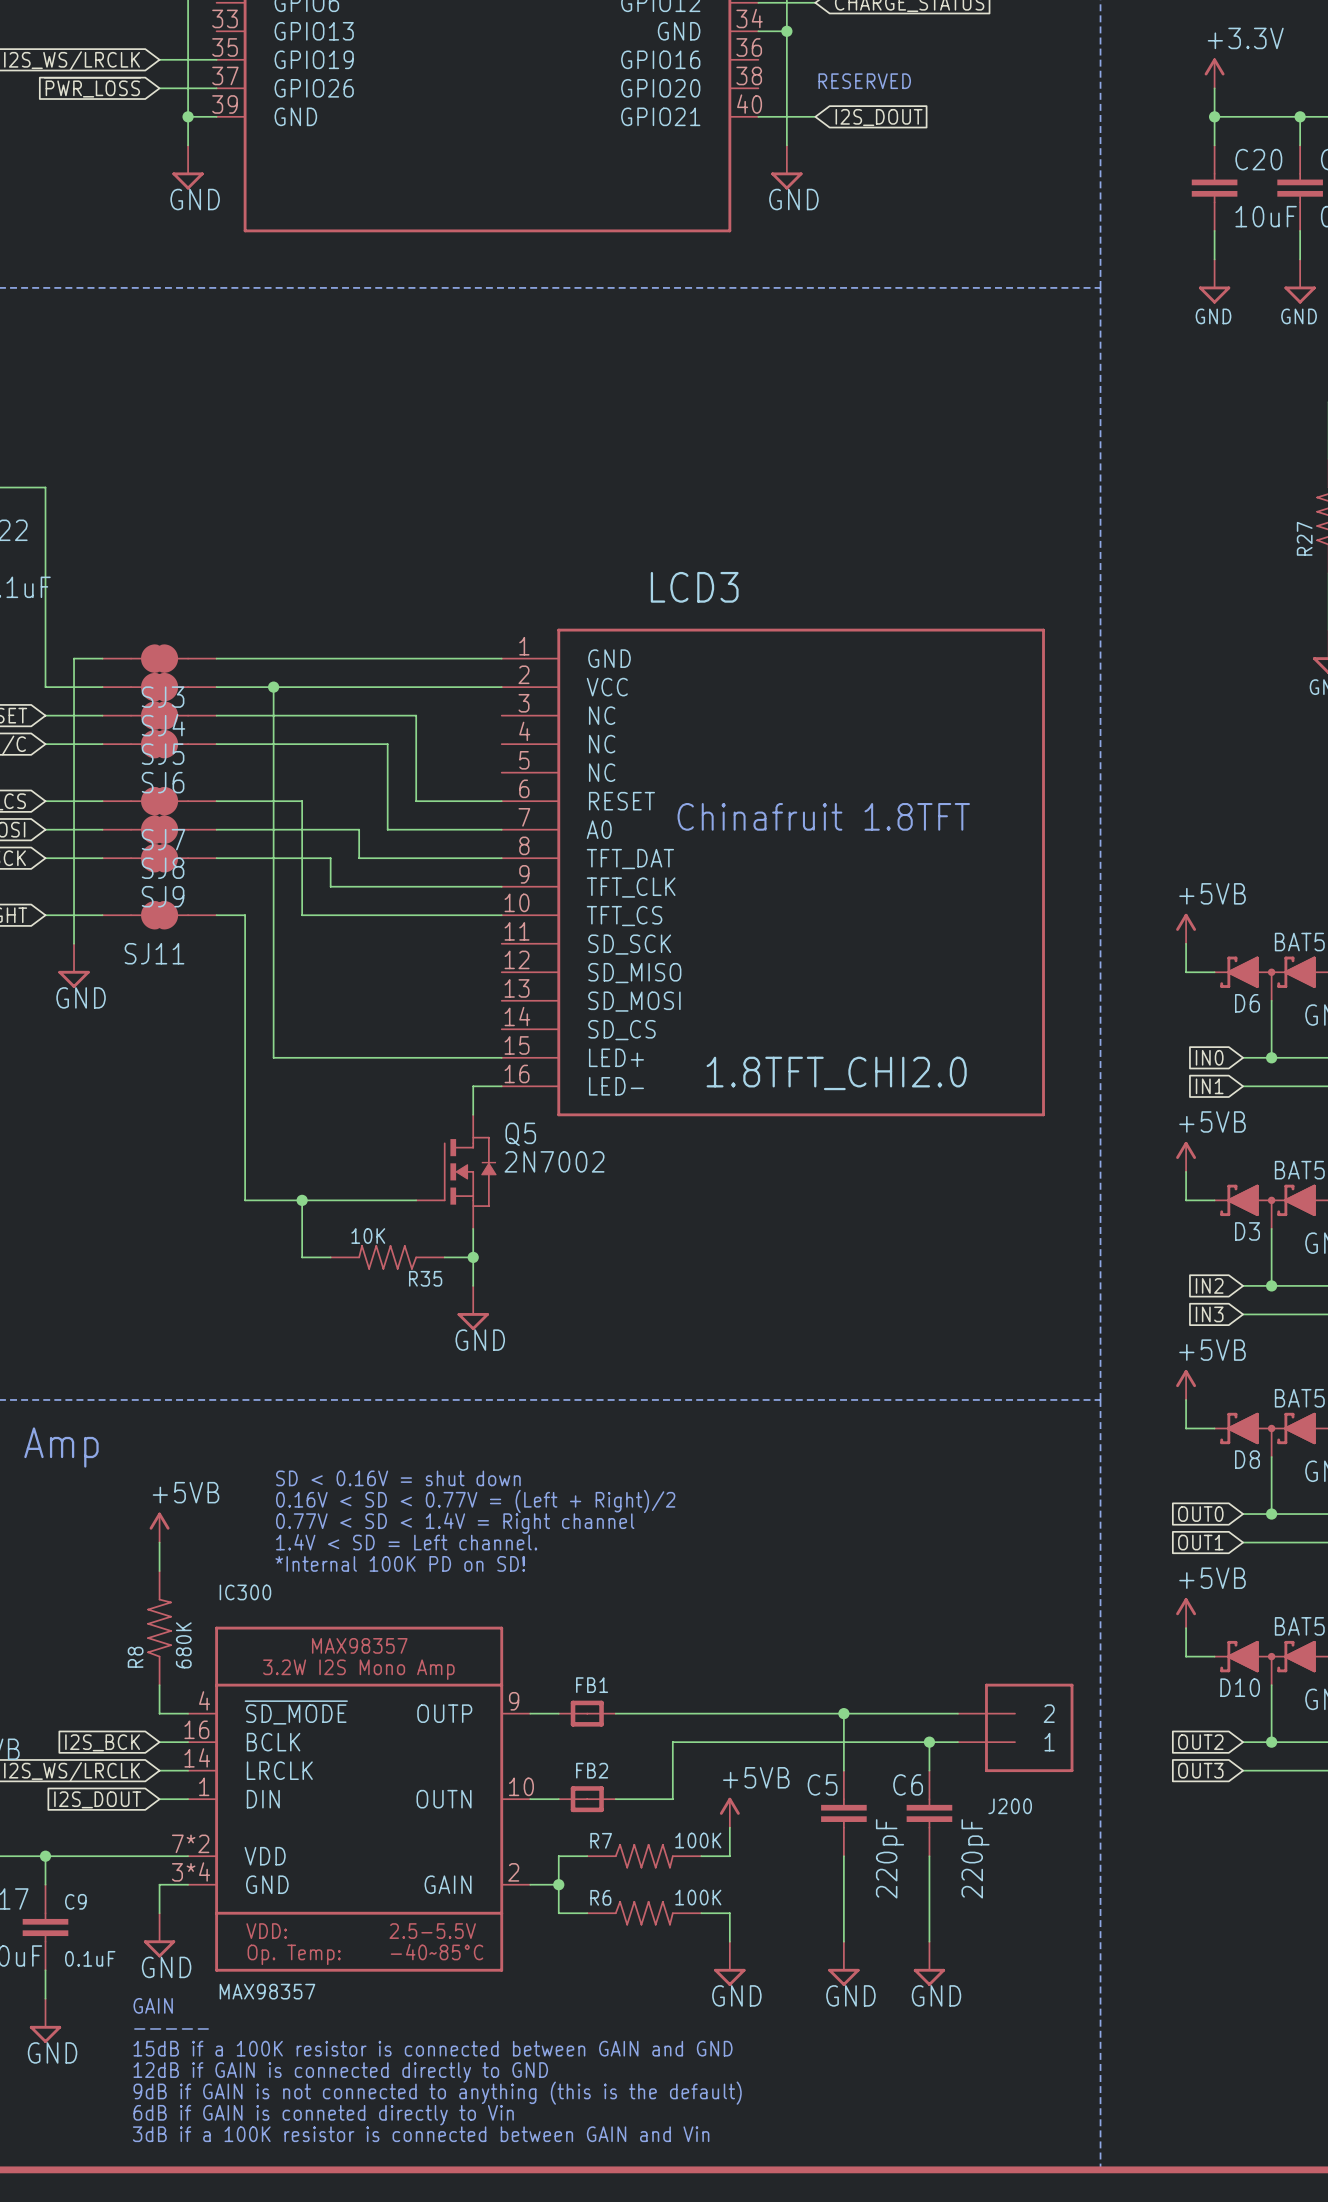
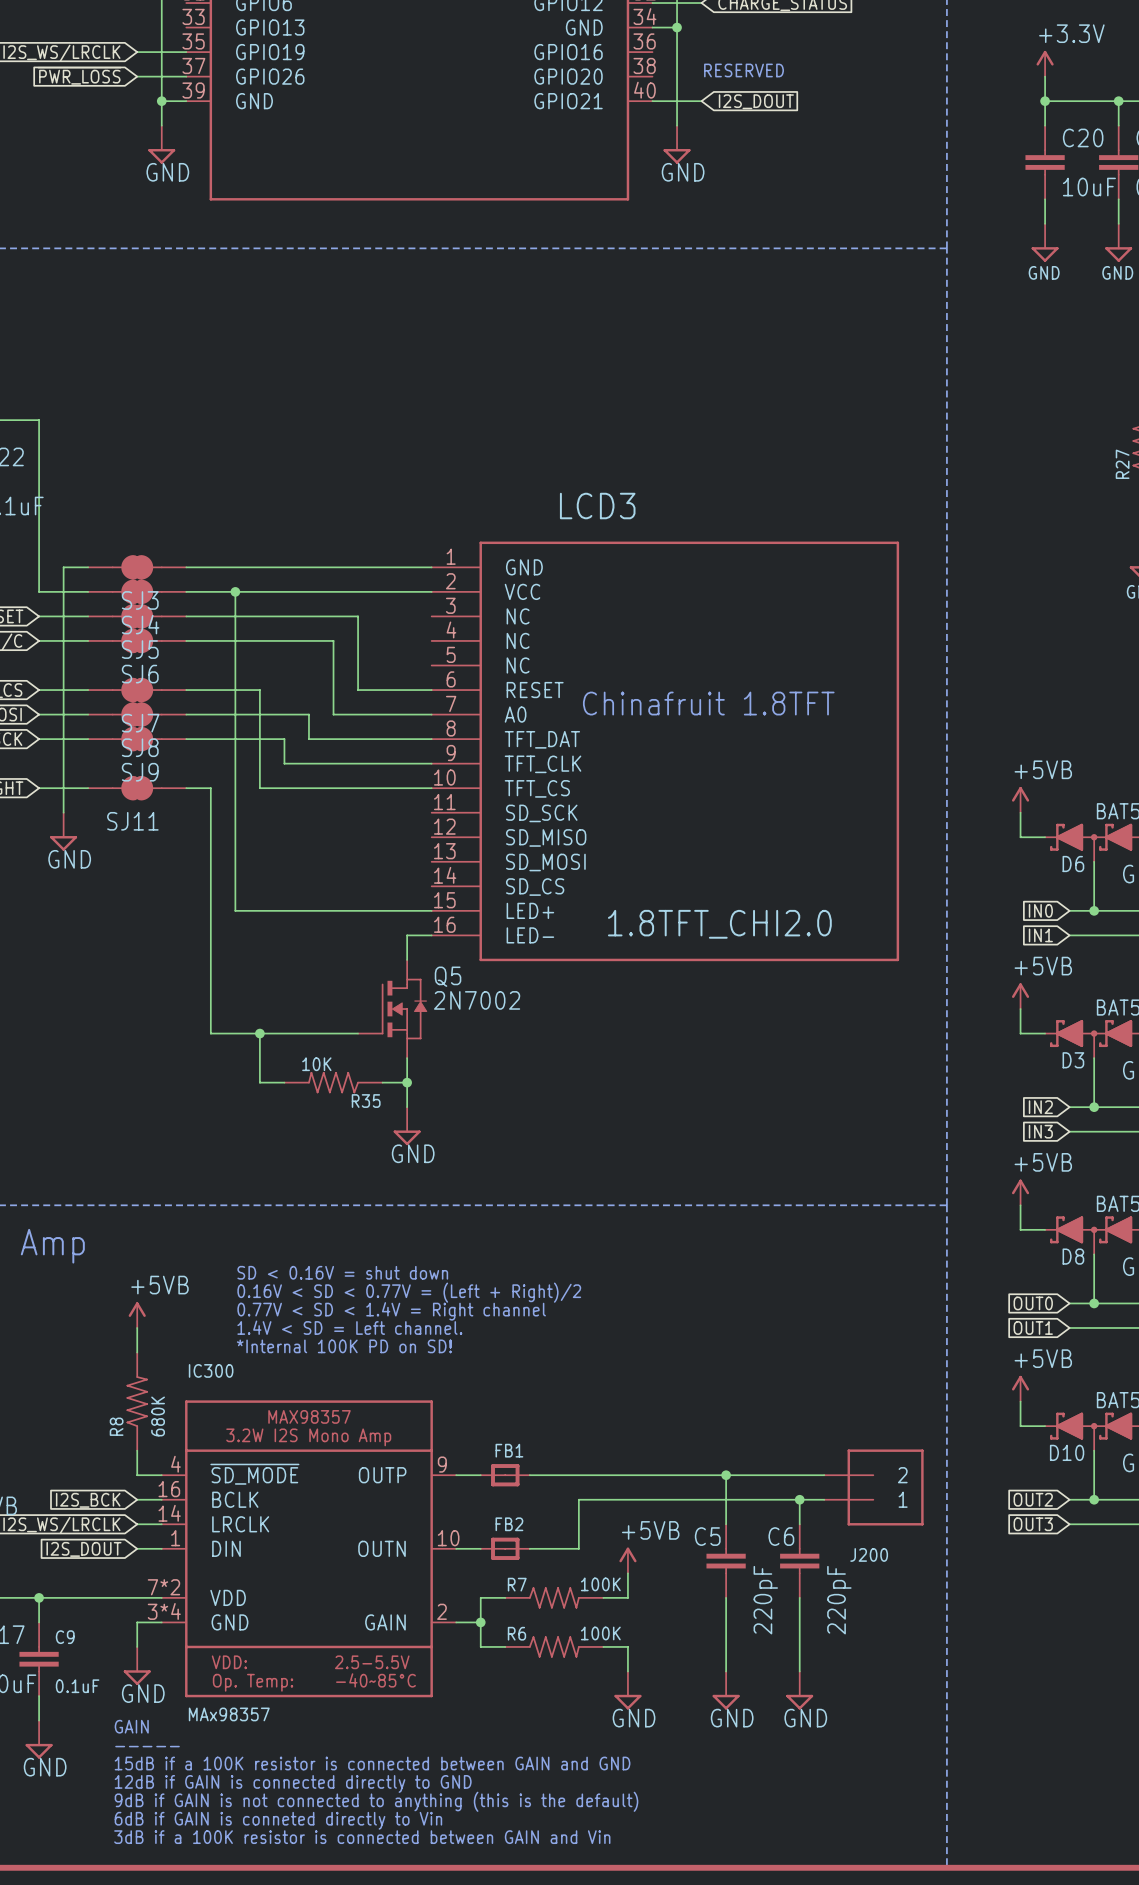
IC300 value: MAX98357 (267, 1991) -> MAx98357 (229, 1714)

